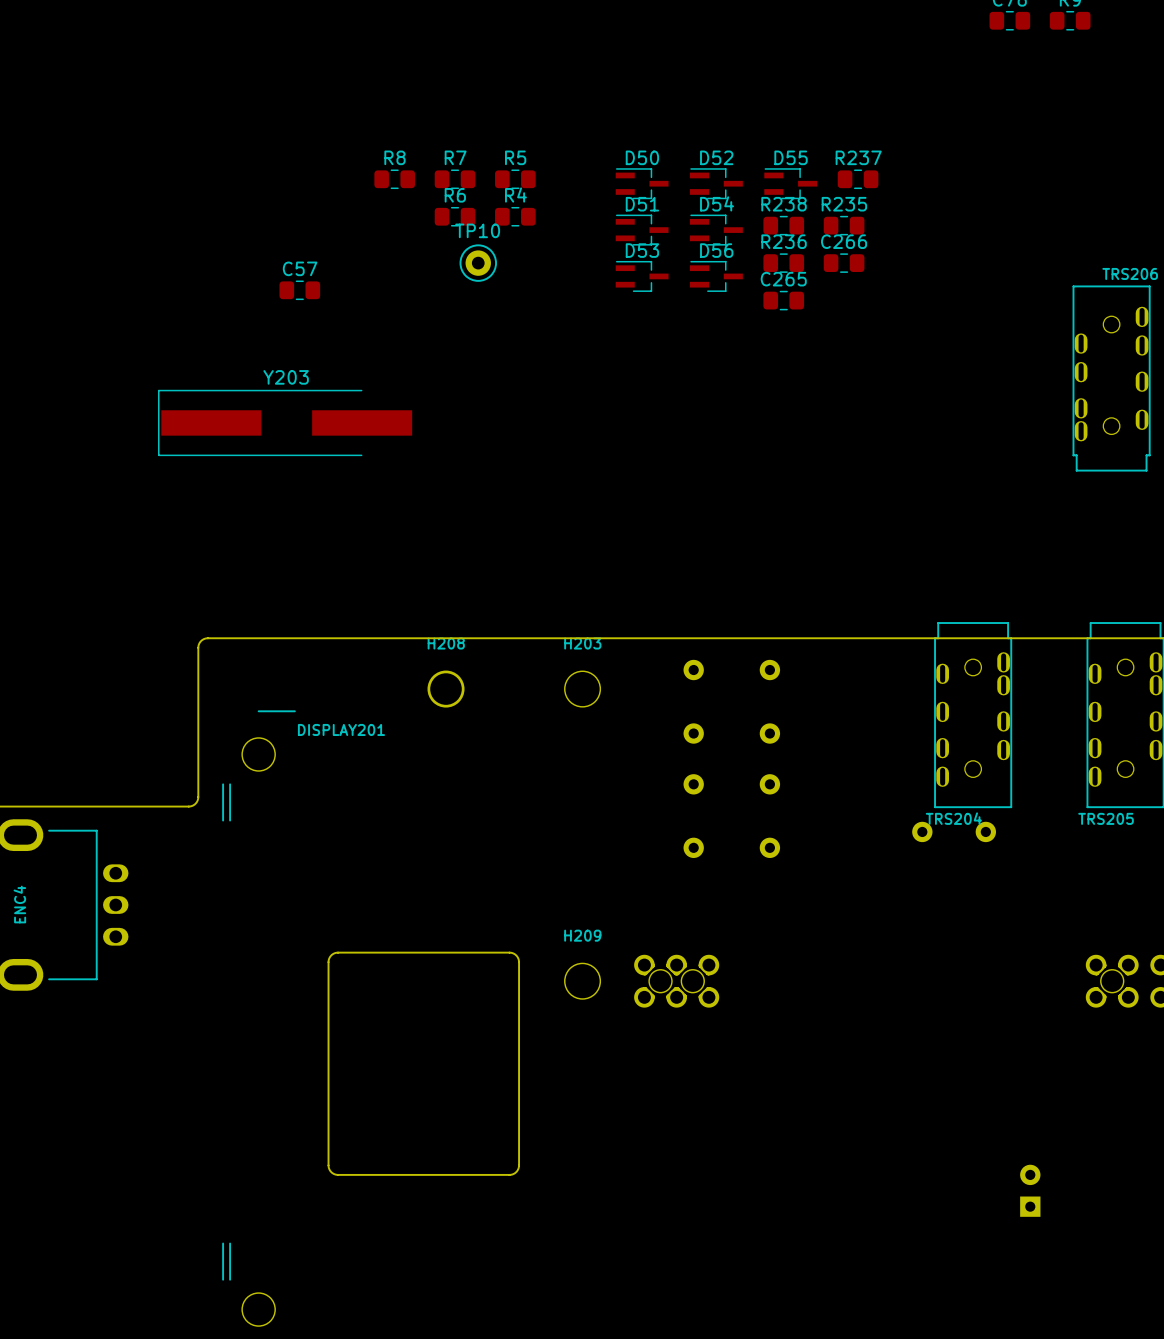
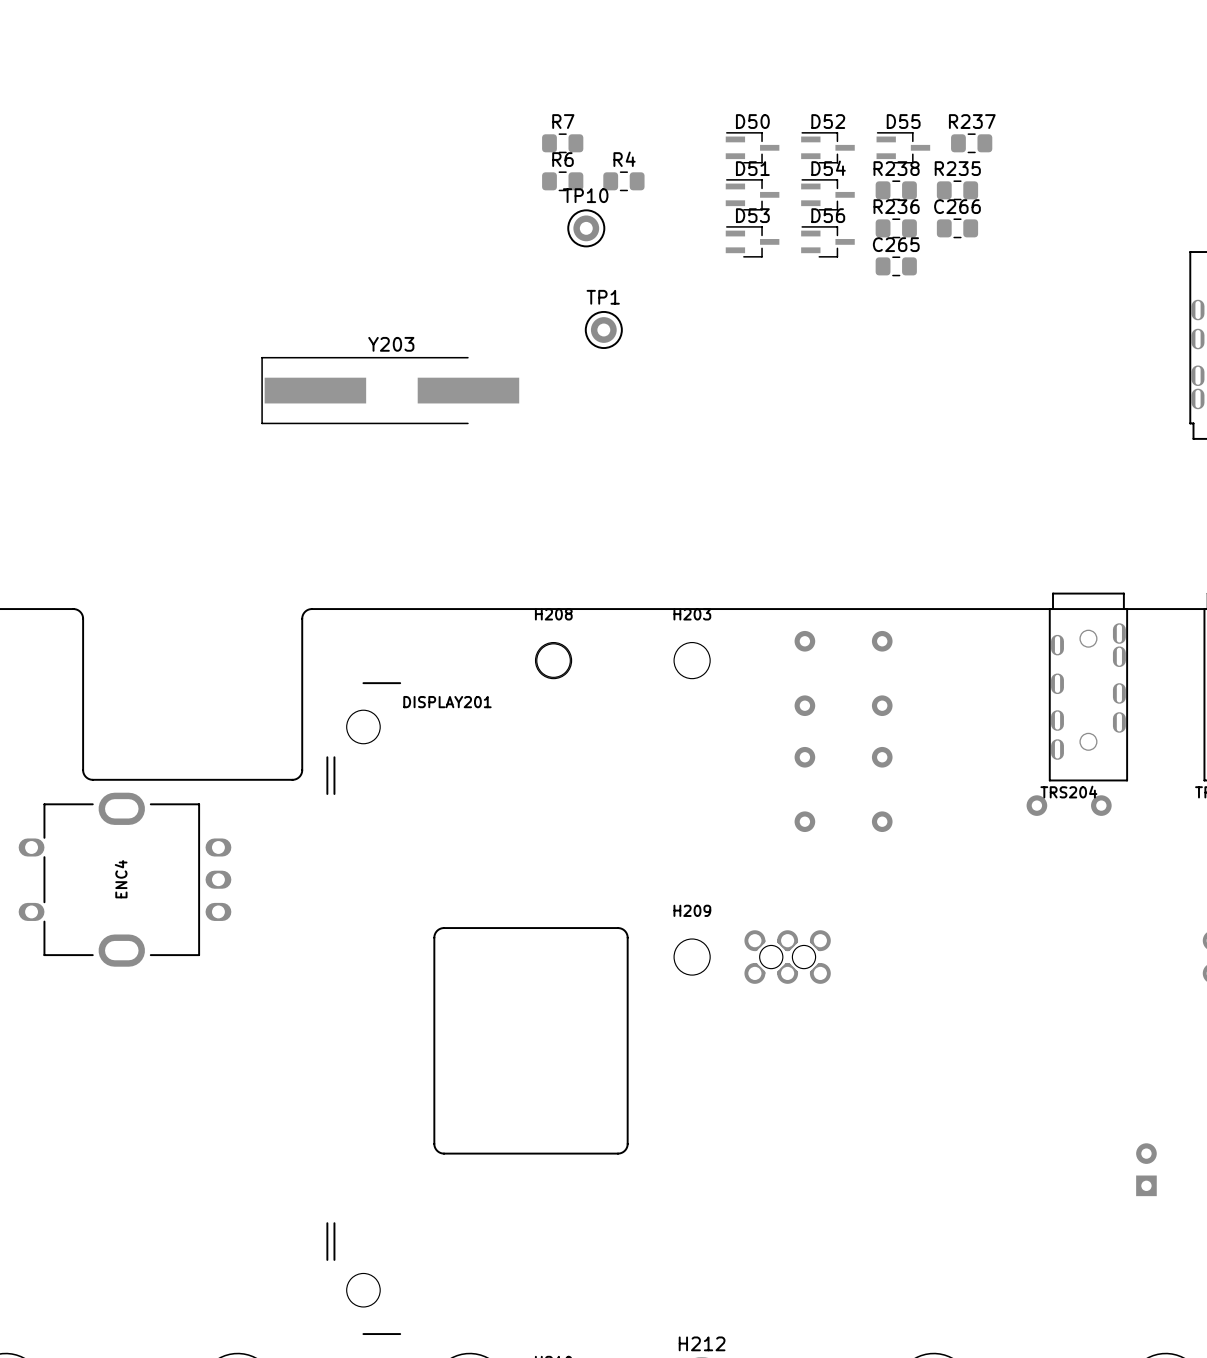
R8: (394, 179) -> none
R5: (515, 179) -> none
C57: (299, 290) -> none
TP1: none -> (603, 329)

